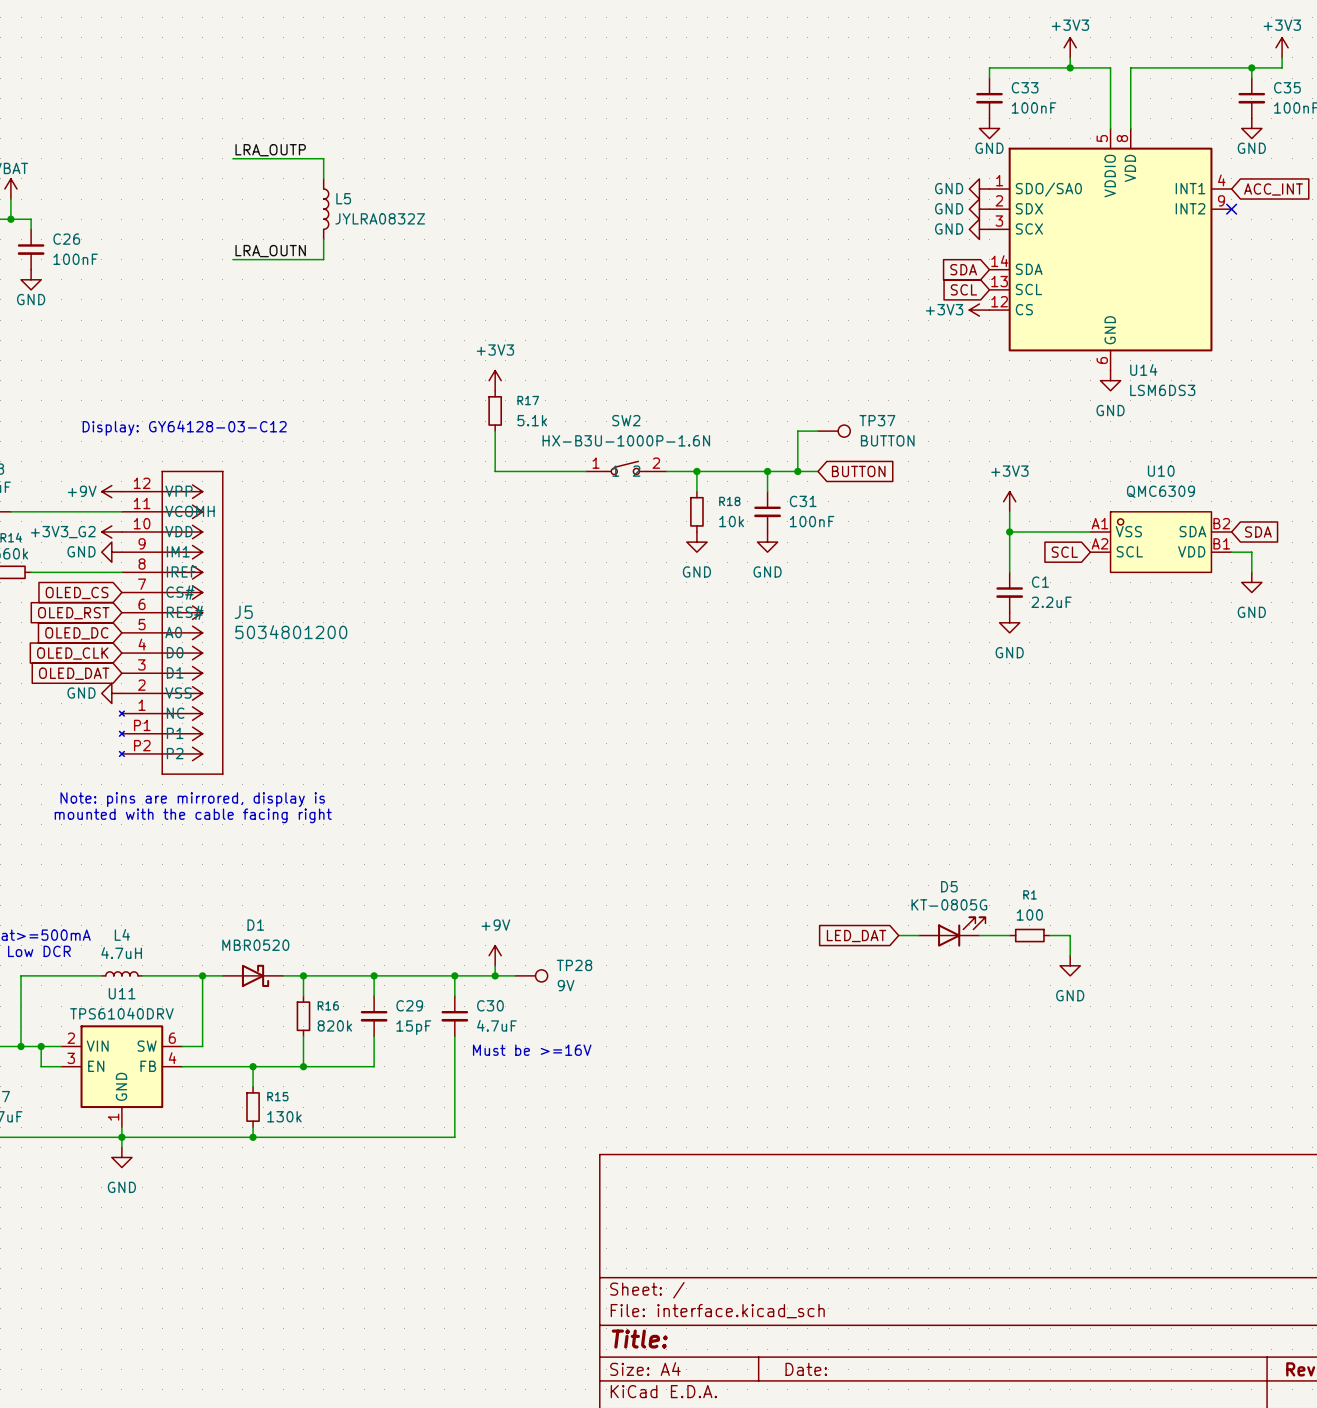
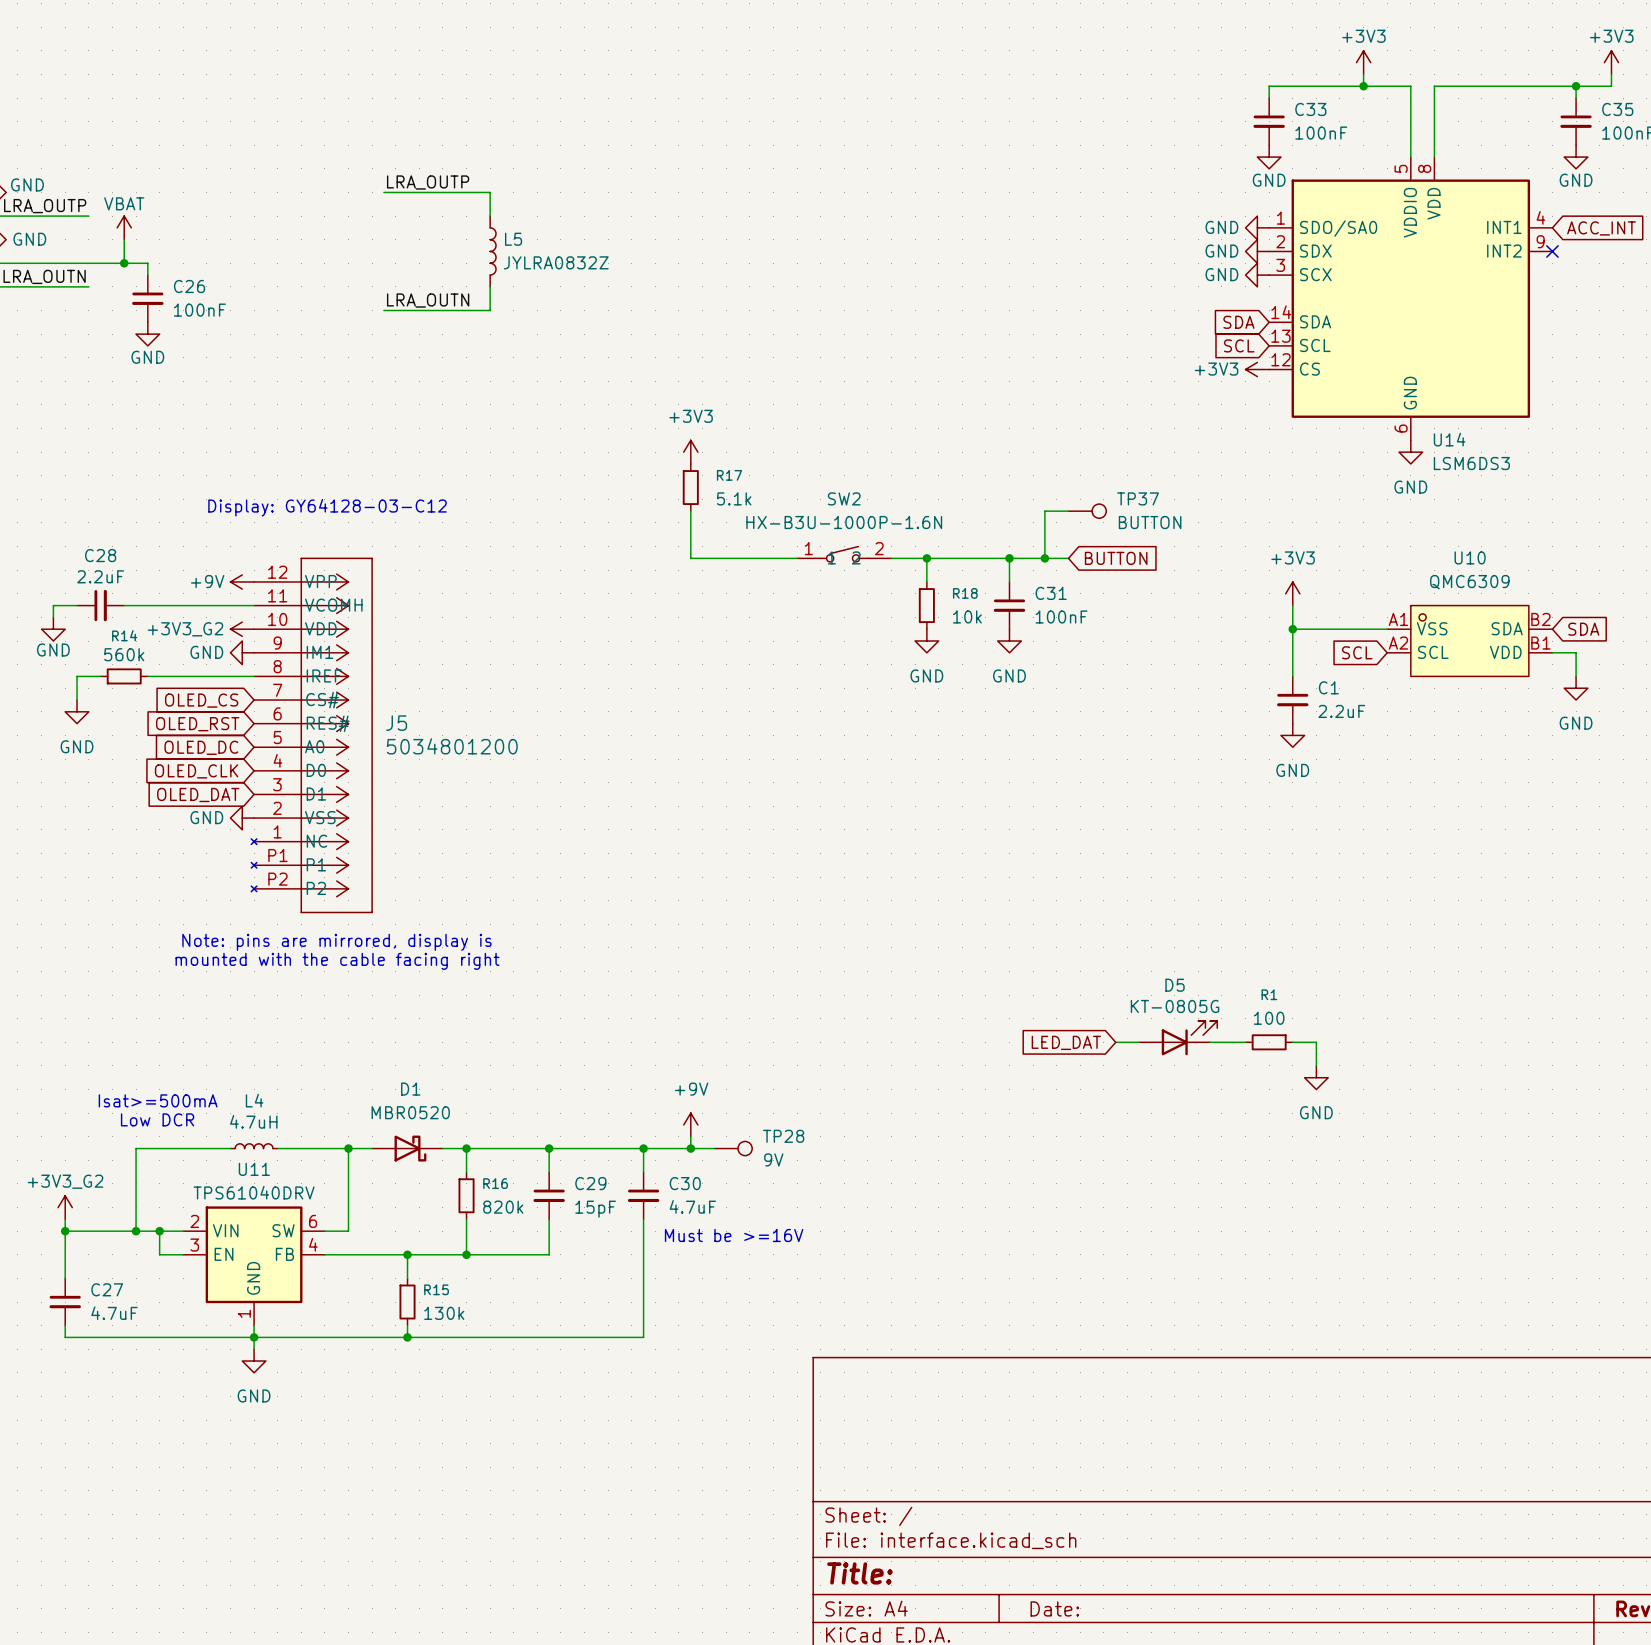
D5 position: (952, 932) -> (1178, 1038)
wire: (898, 935) (918, 935) -> (1115, 1042) (1139, 1042)
wire: (979, 935) (1009, 935) -> (1210, 1042) (1245, 1042)
R1 position: (1029, 935) -> (1269, 1042)
wire: (1050, 935) (1070, 935) (1070, 955) -> (1292, 1042) (1316, 1042) (1316, 1065)
global label position: LED_DAT (856, 936) -> LED_DAT (1066, 1042)
power symbol position: GND (1070, 965) -> GND (1316, 1077)

